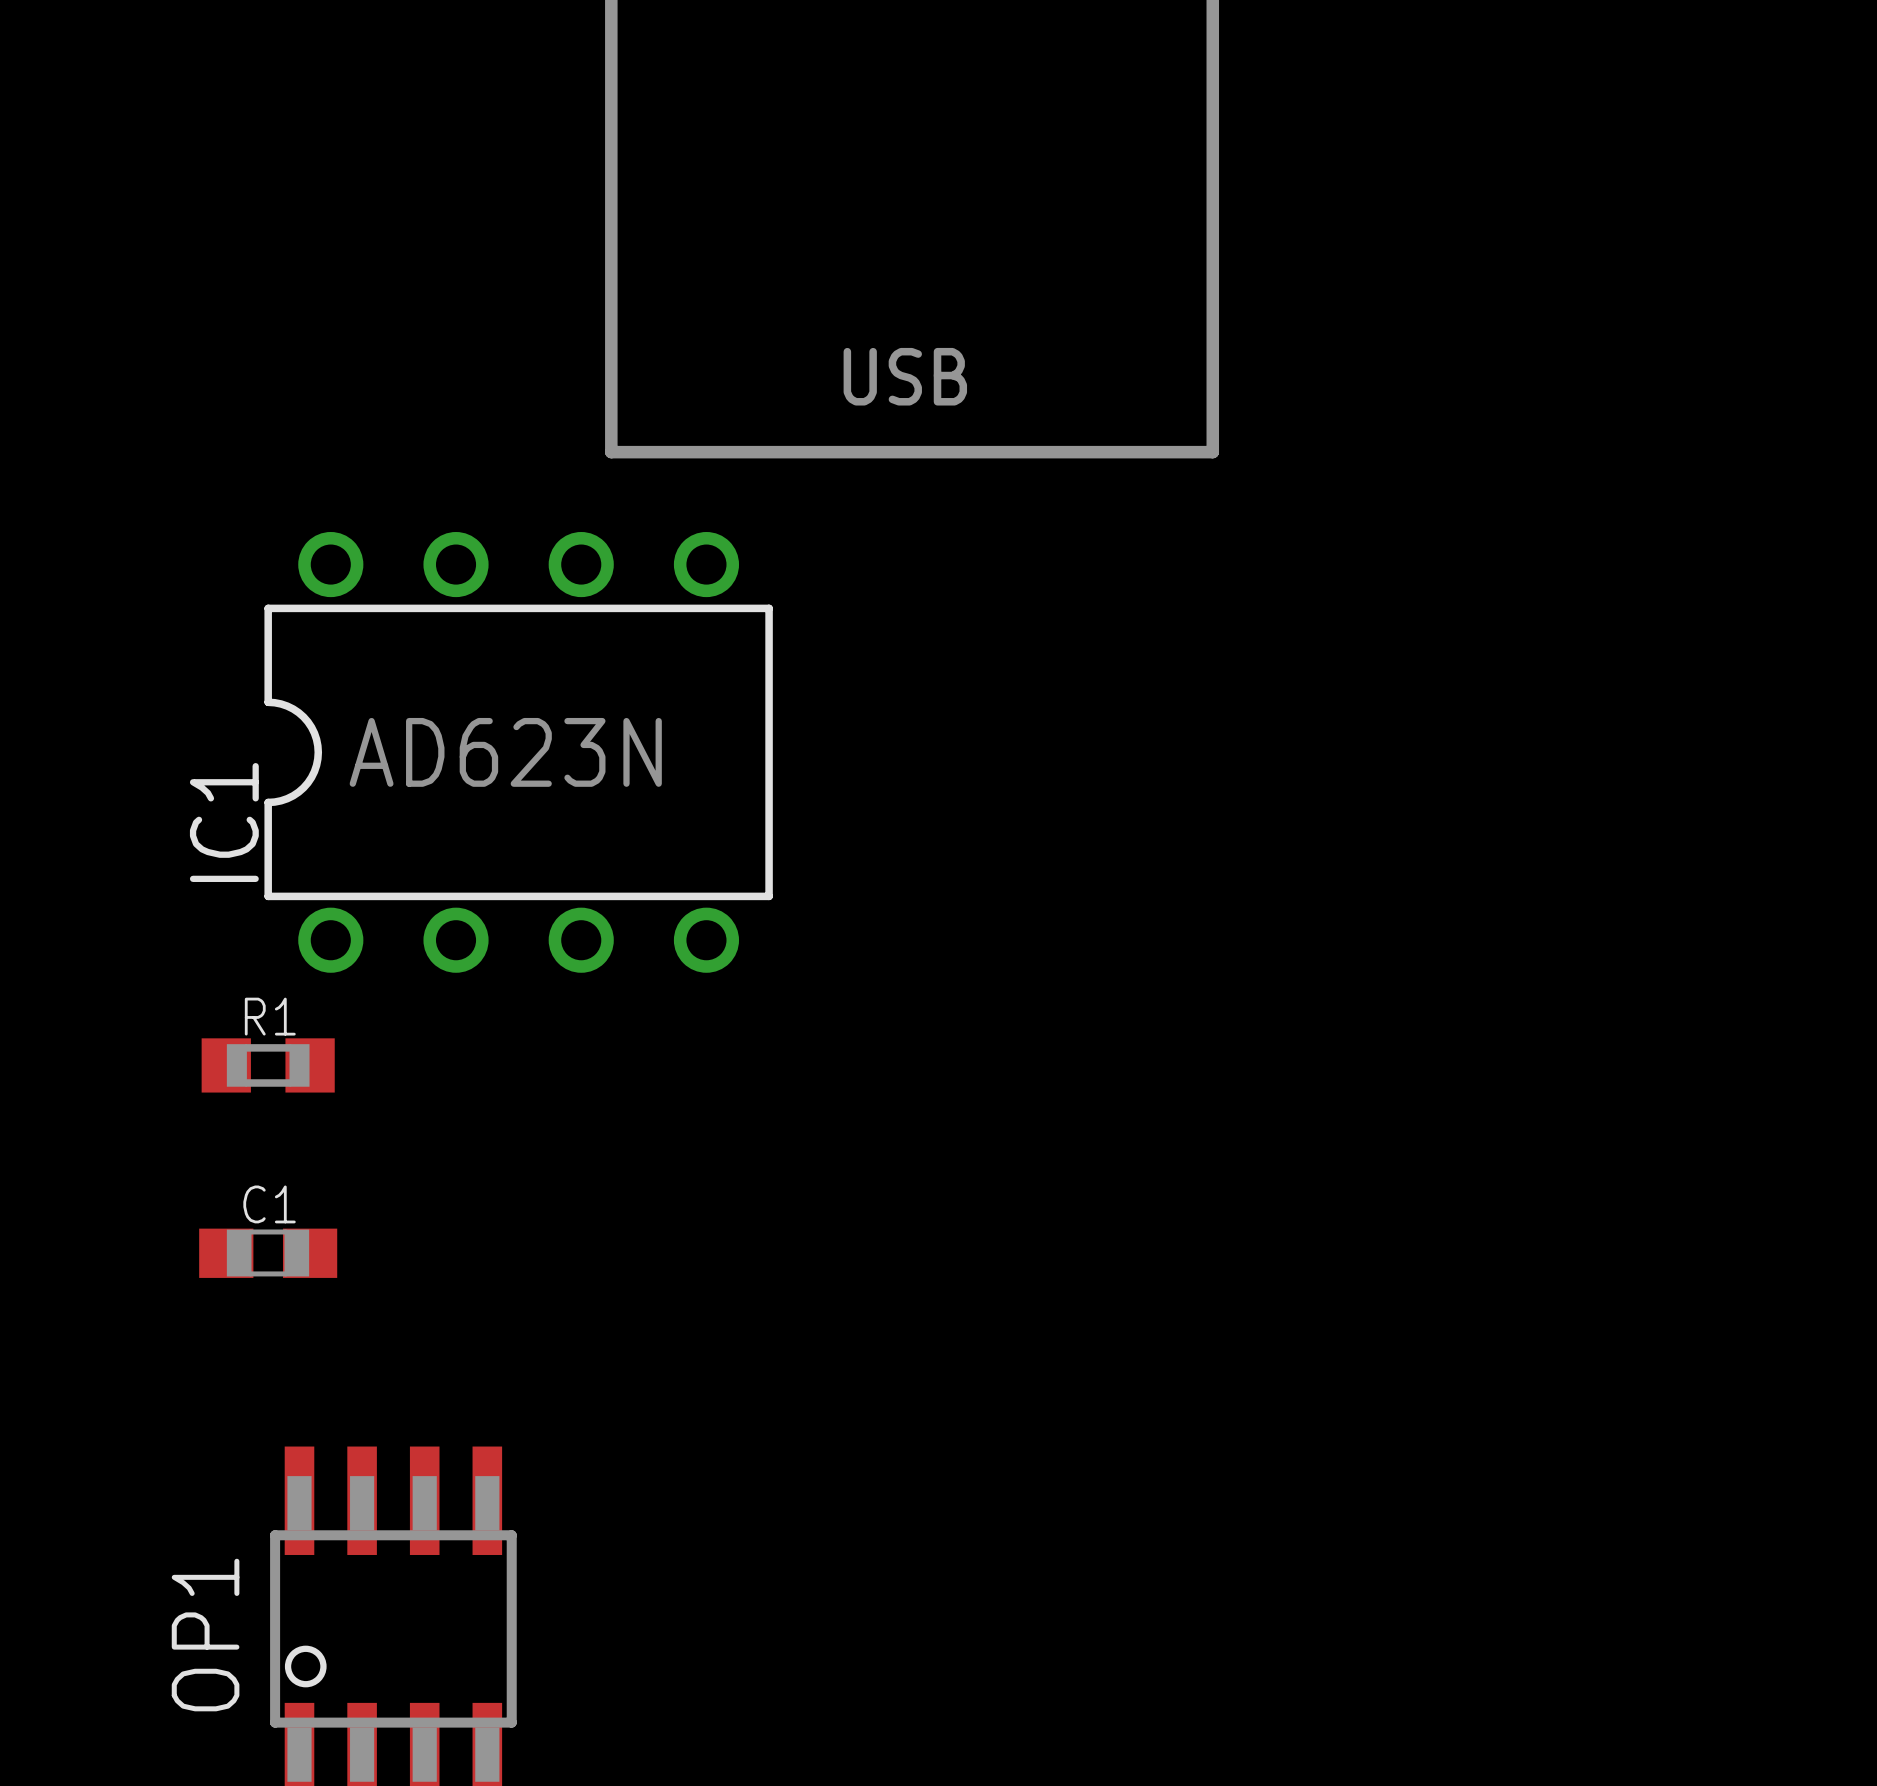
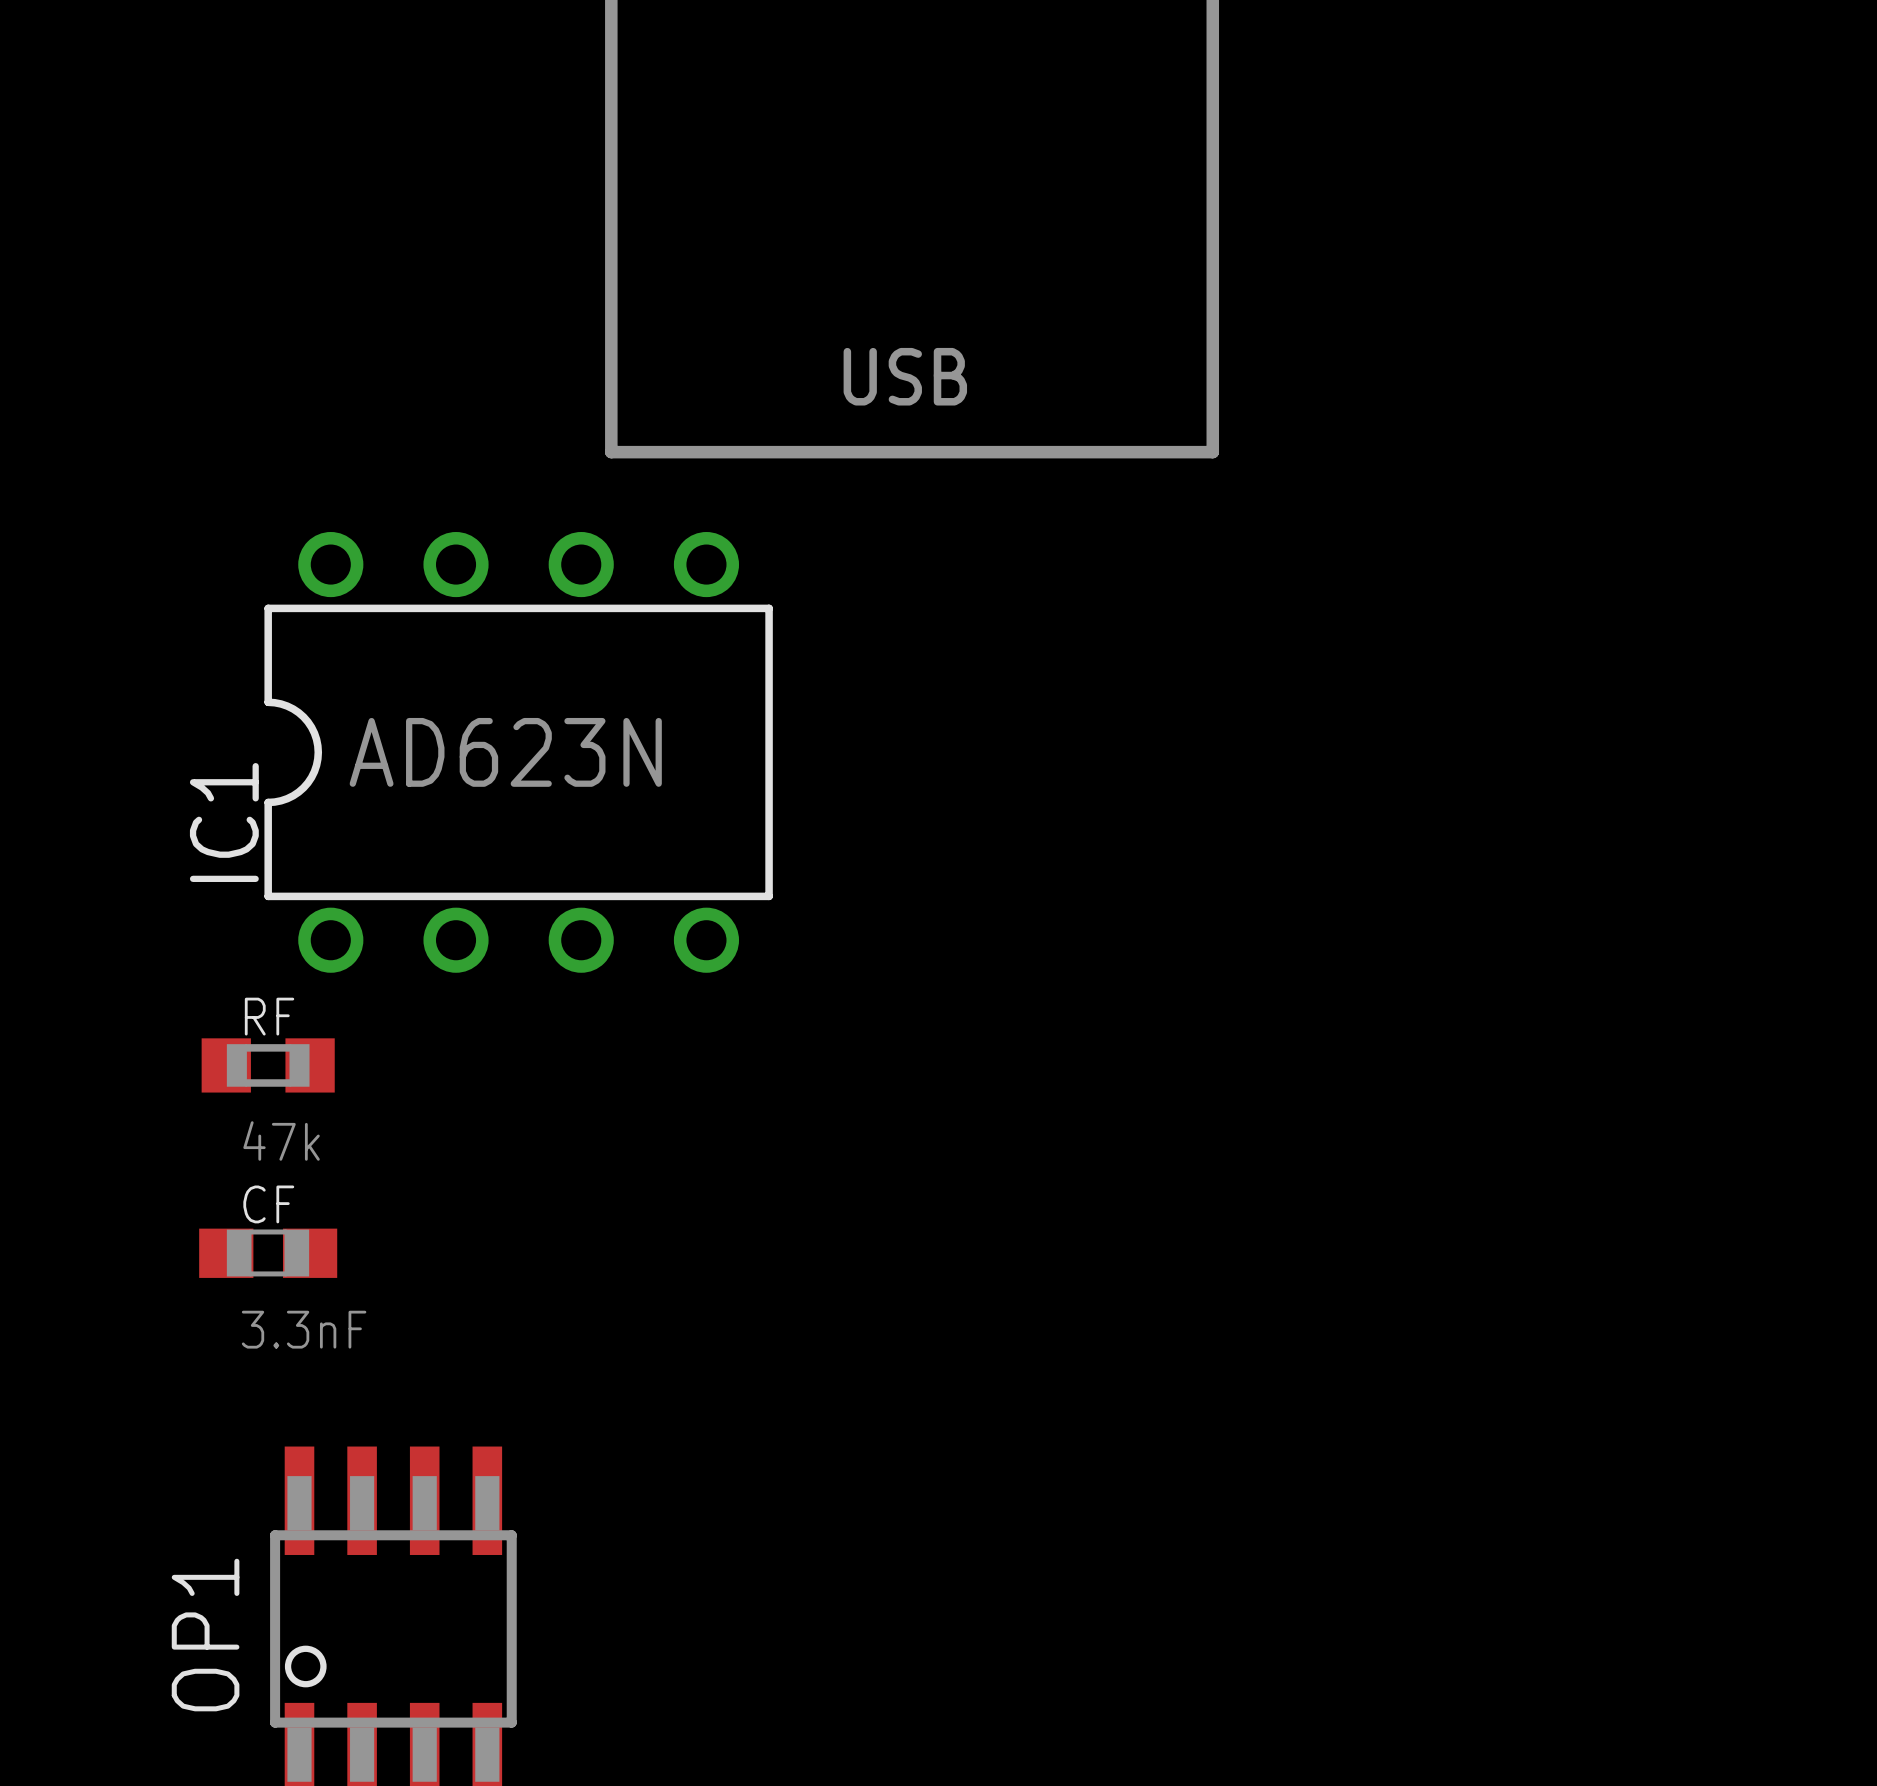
R1 name: R1 (270, 1016) -> RF (269, 1016)
R1 value: none -> 47k (281, 1140)
C1 name: C1 (269, 1204) -> CF (268, 1204)
C1 value: none -> 3.3nF (304, 1329)

